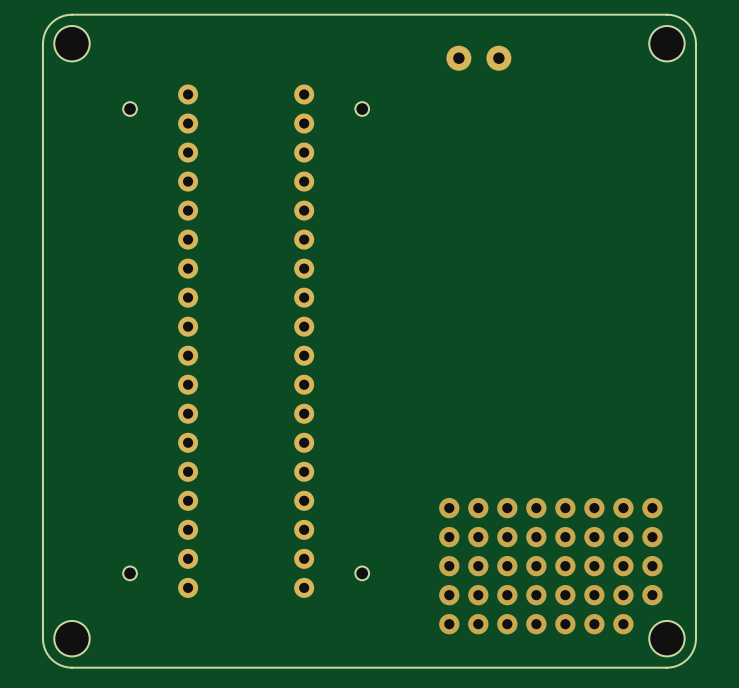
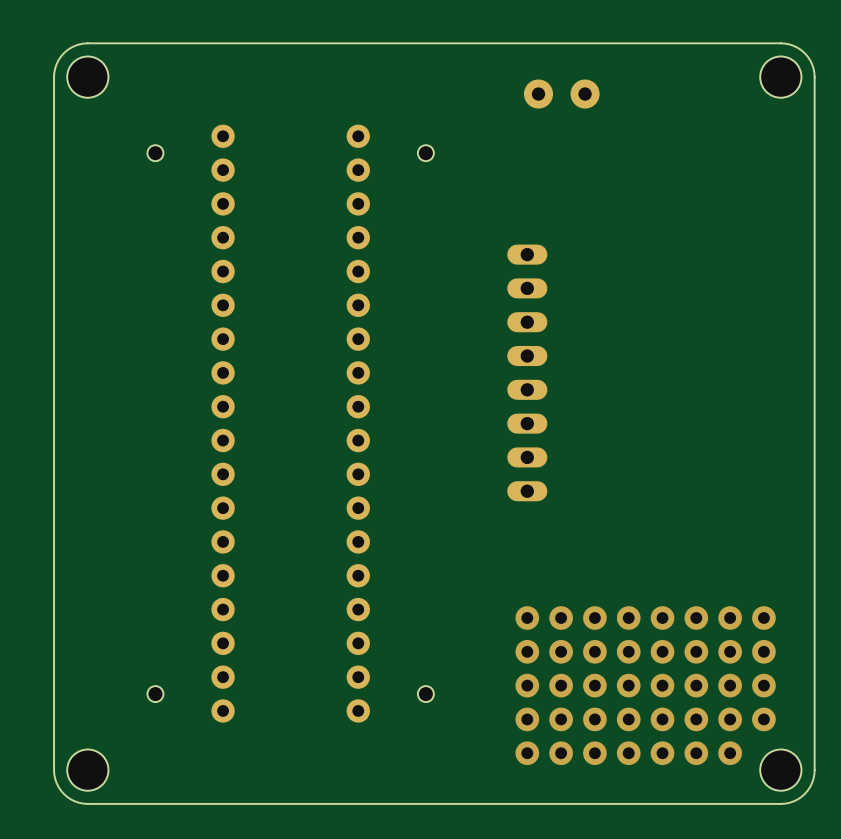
part: none -> (527, 372)

